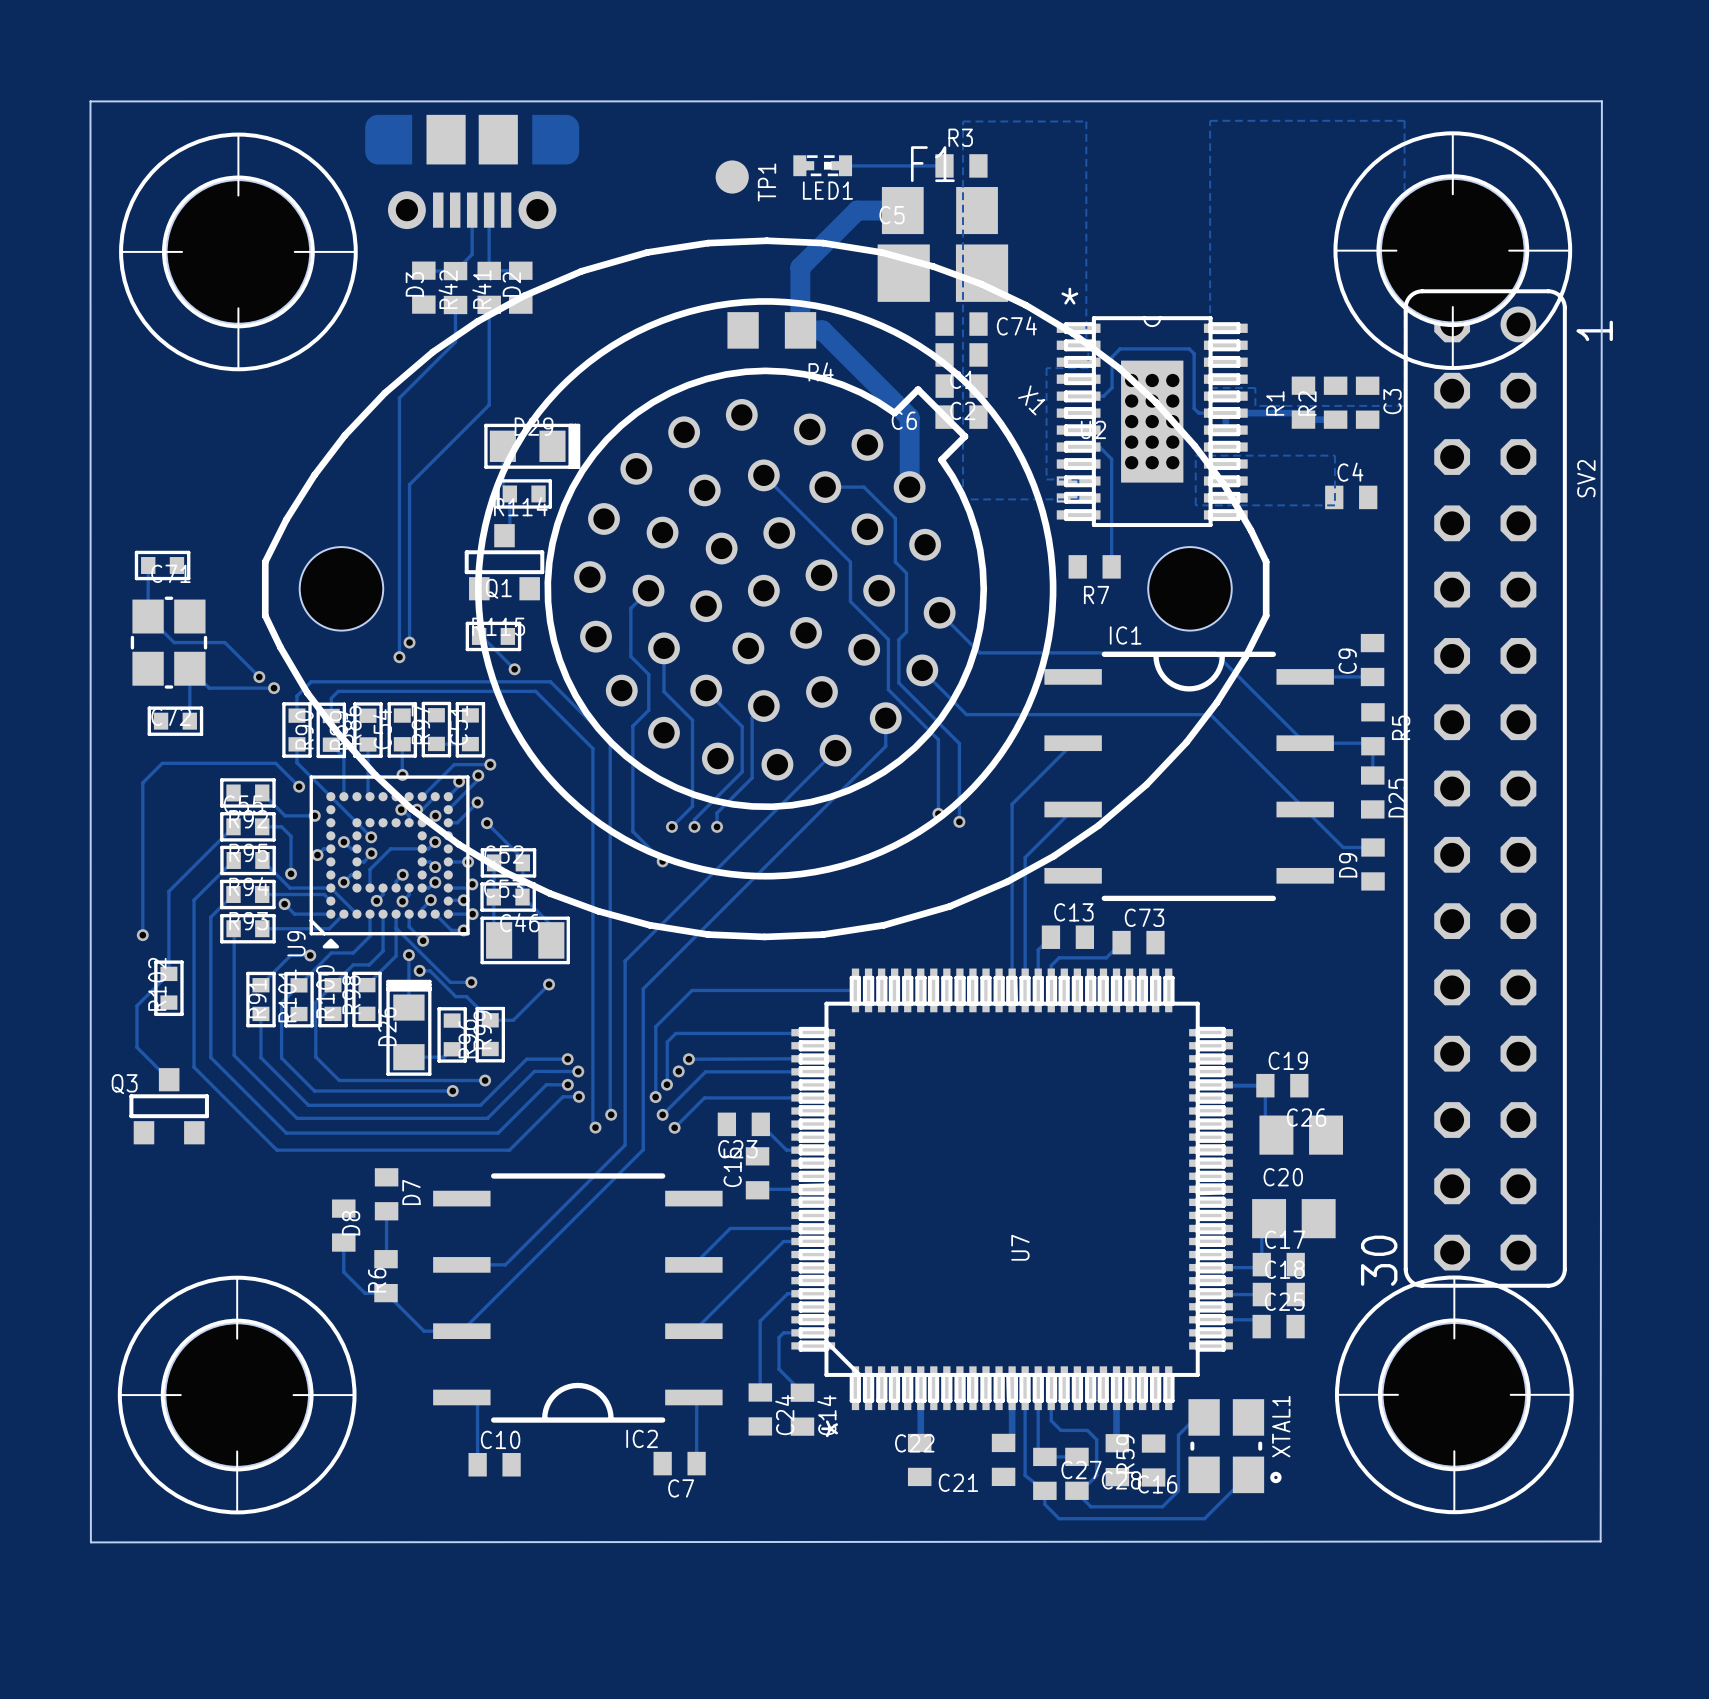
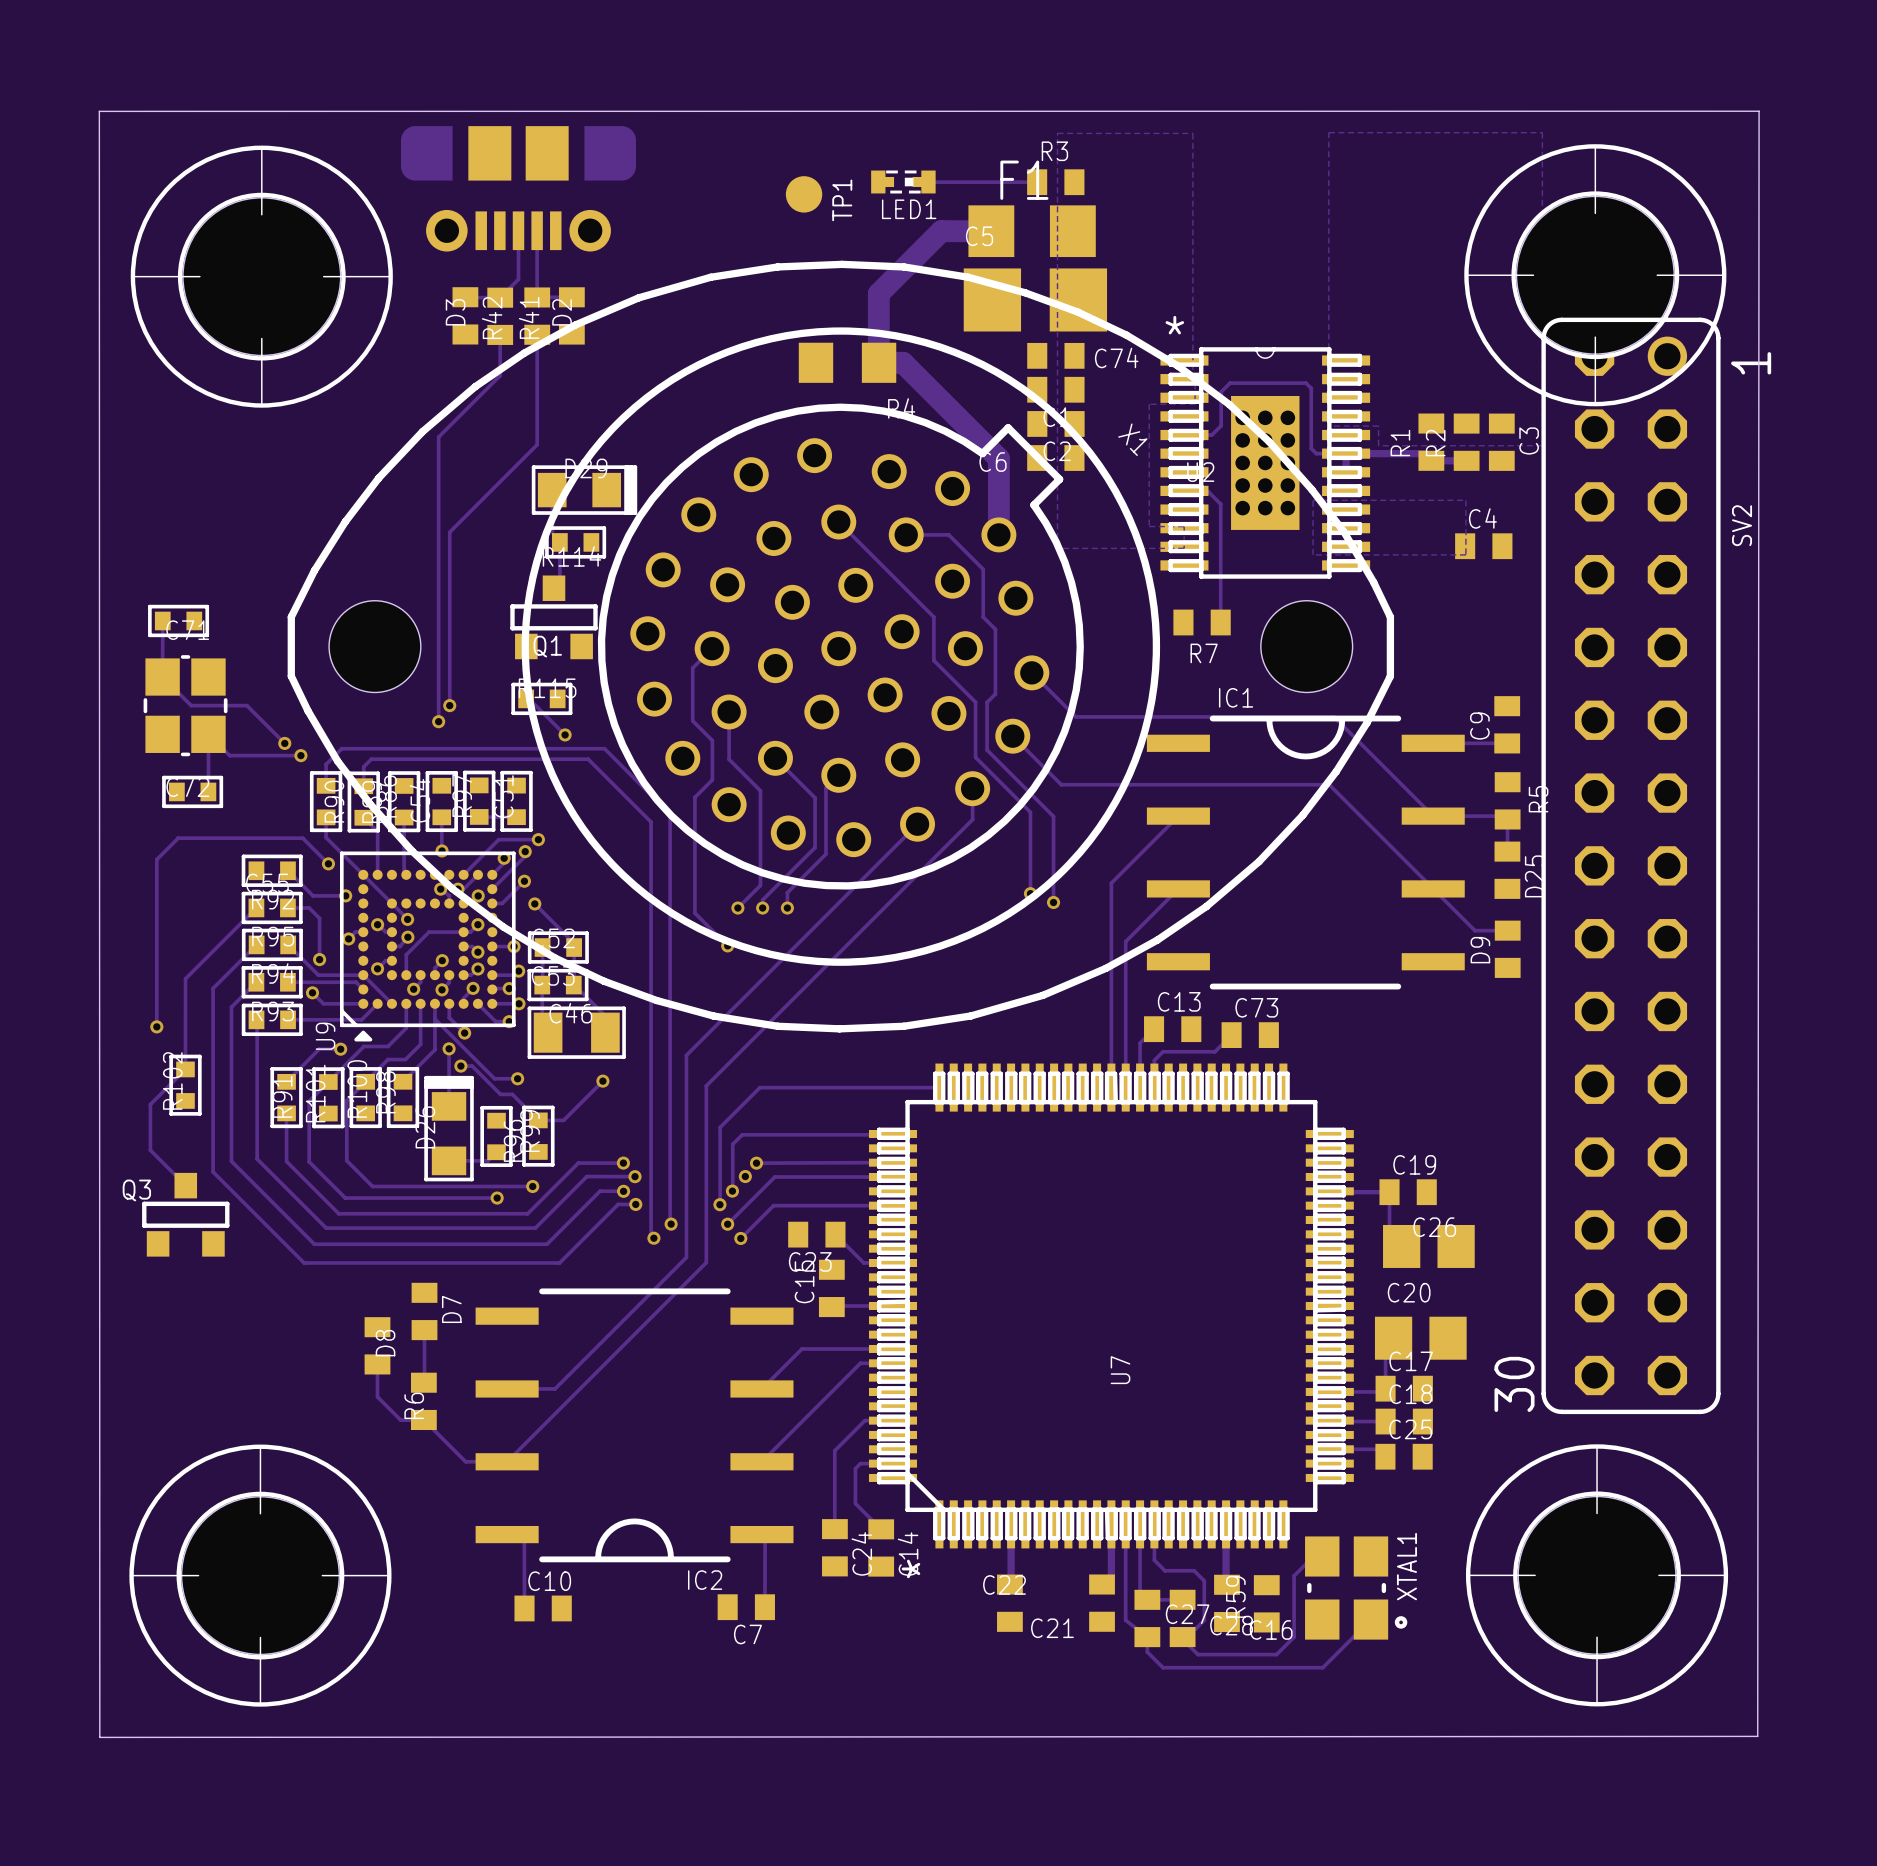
board edge: (1601, 101) (1600, 1541) (90, 1542) -> (1759, 111) (1757, 1736) (99, 1737) (99, 1693)
part position: (1454, 1394) -> (1597, 1575)
part position: (237, 1395) -> (260, 1575)

